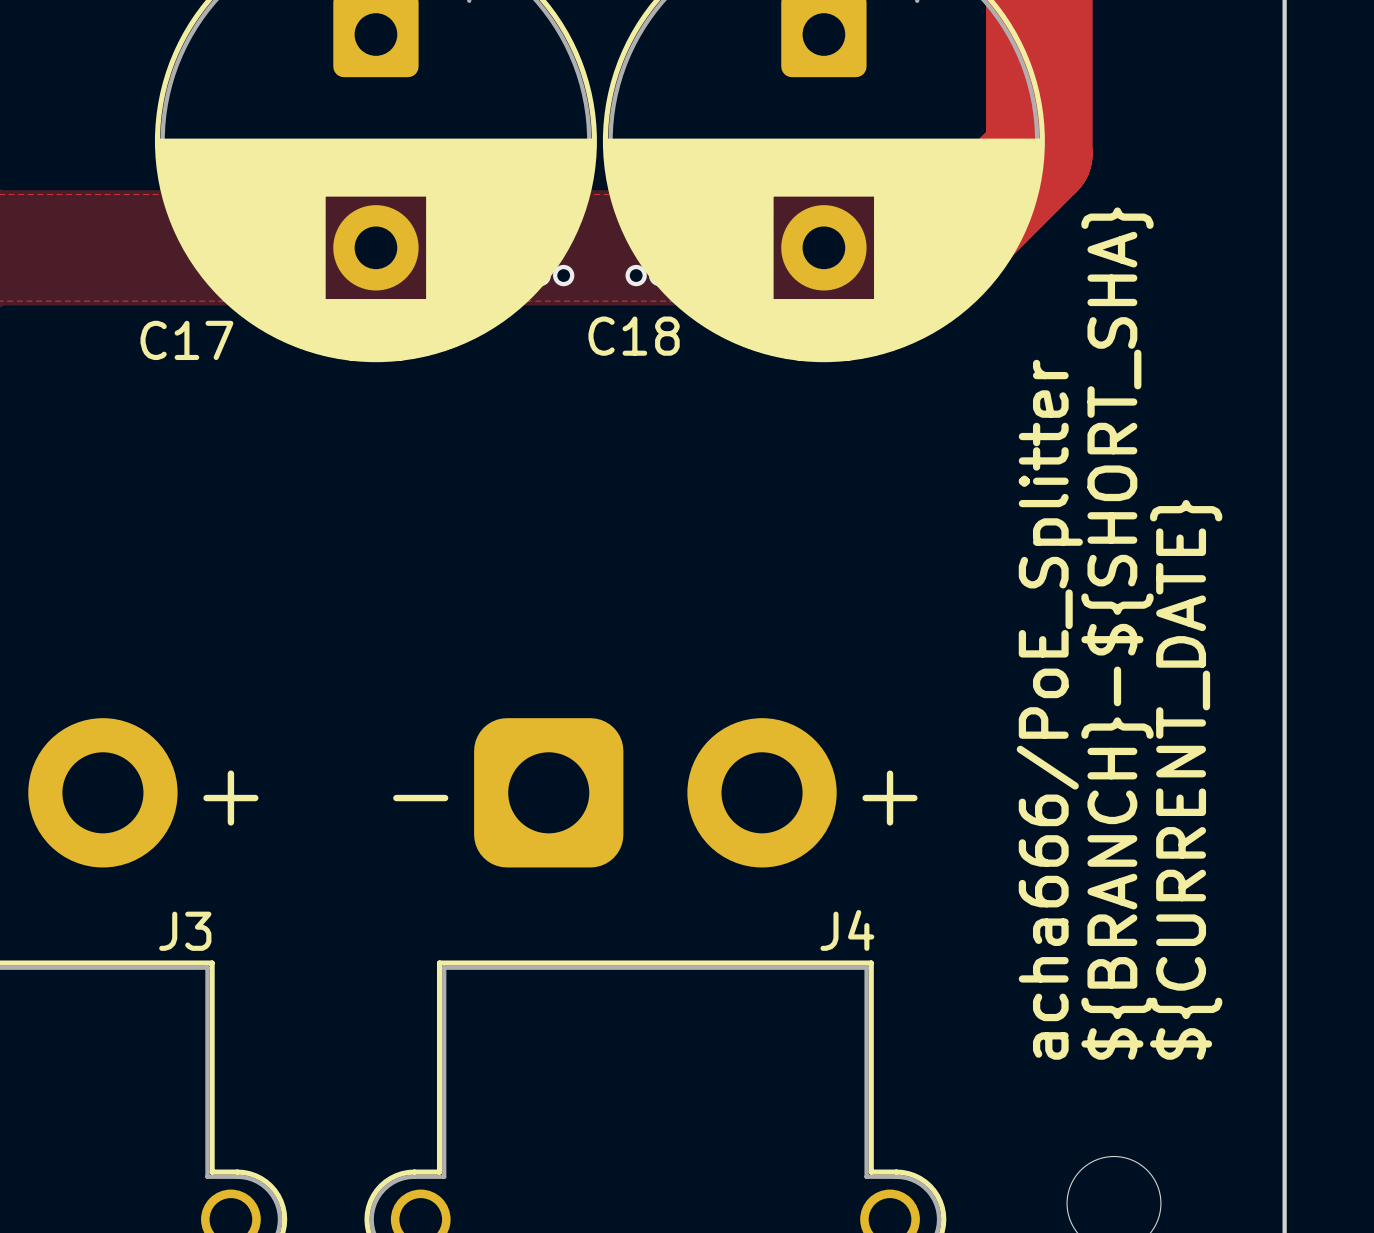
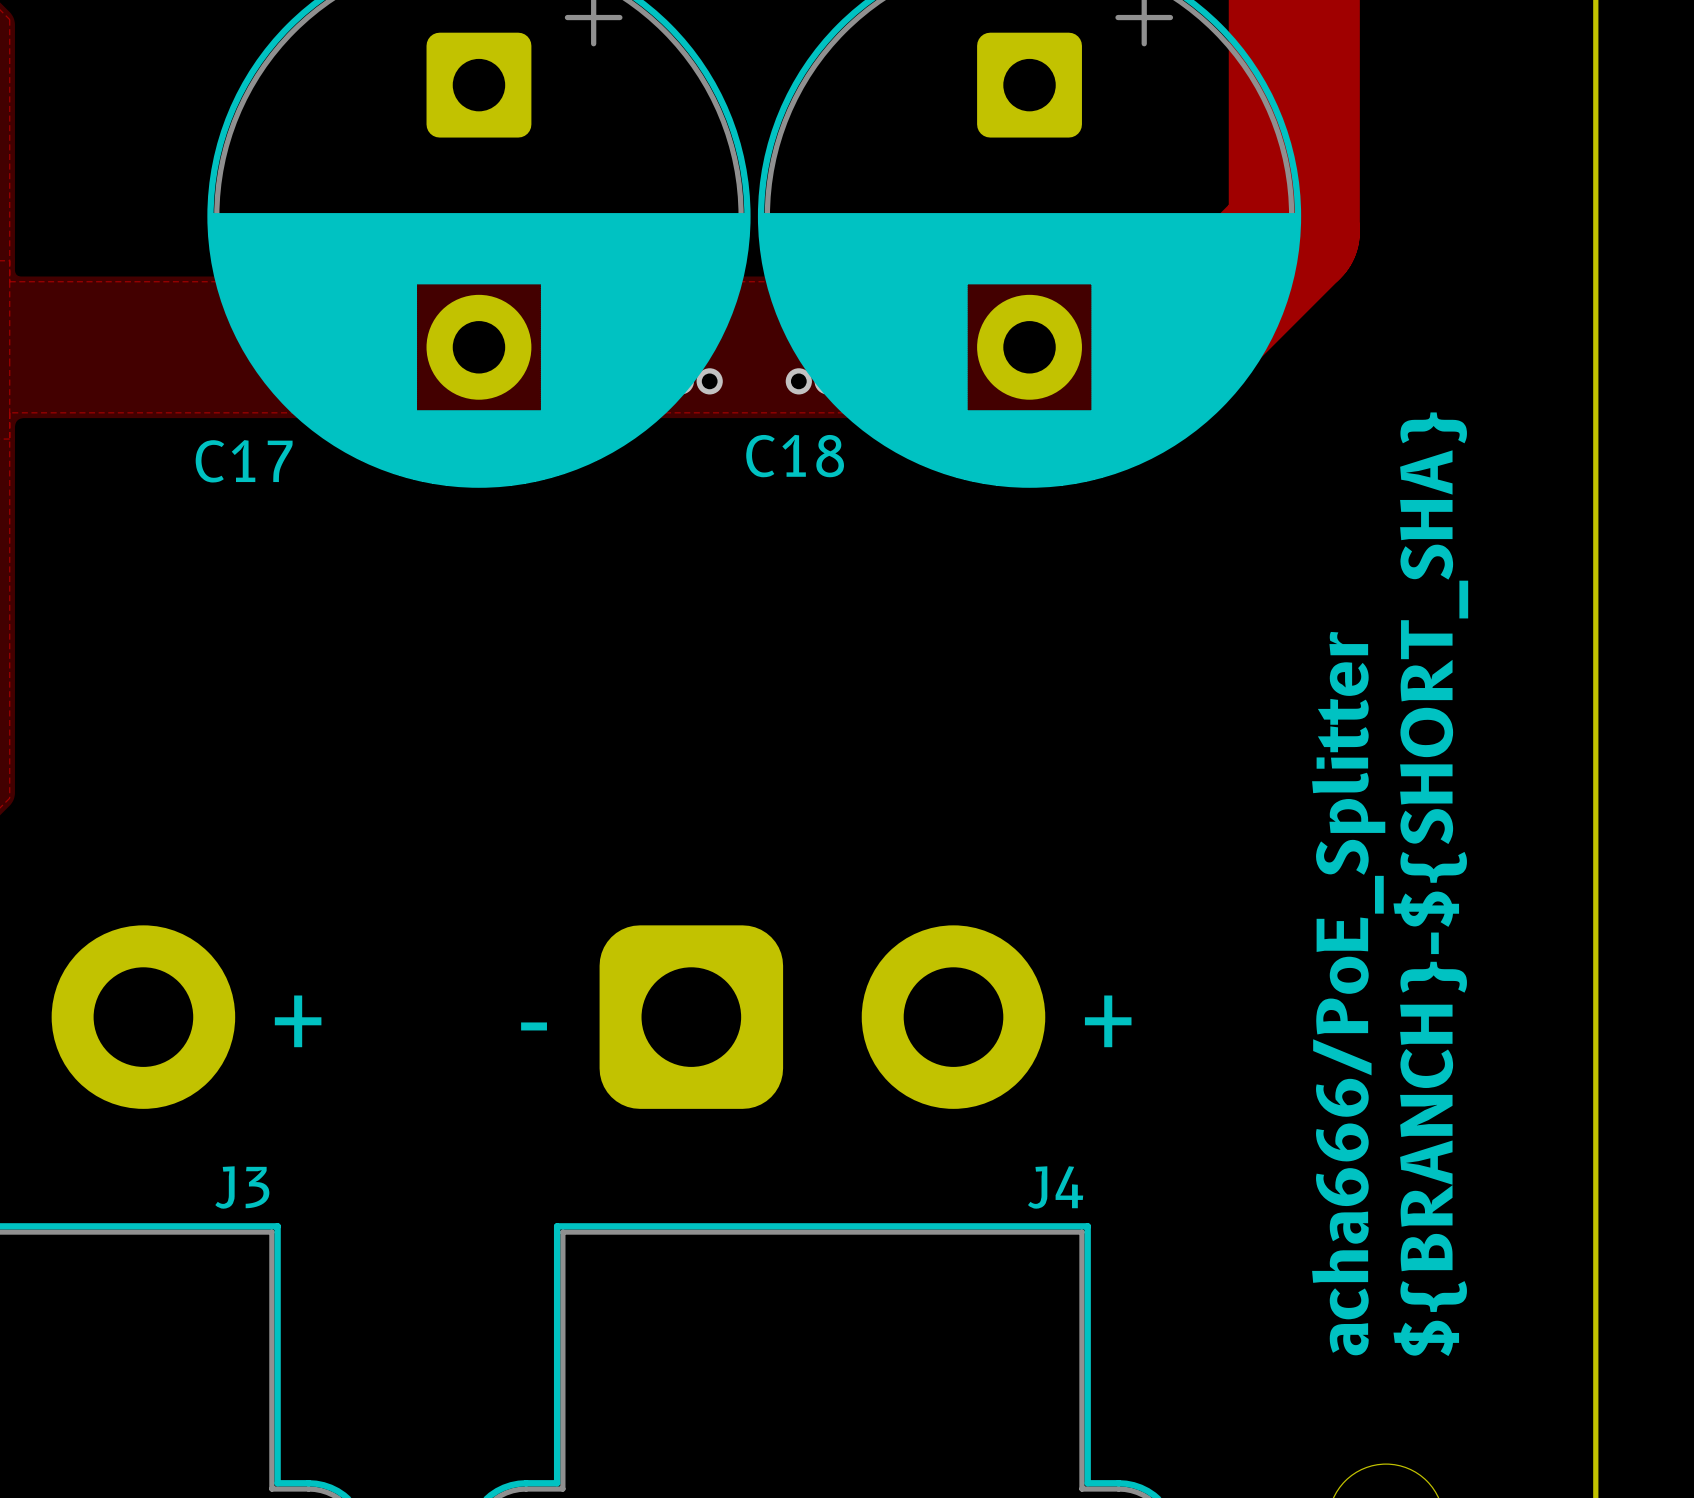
text position: ${BRANCH}-${SHORT_SHA} (1117, 633) -> ${BRANCH}-${SHORT_SHA} (1430, 884)
text position: acha666/PoE_Splitter (1049, 709) -> acha666/PoE_Splitter (1348, 993)
text: ${CURRENT_DATE} (1186, 779) -> none

